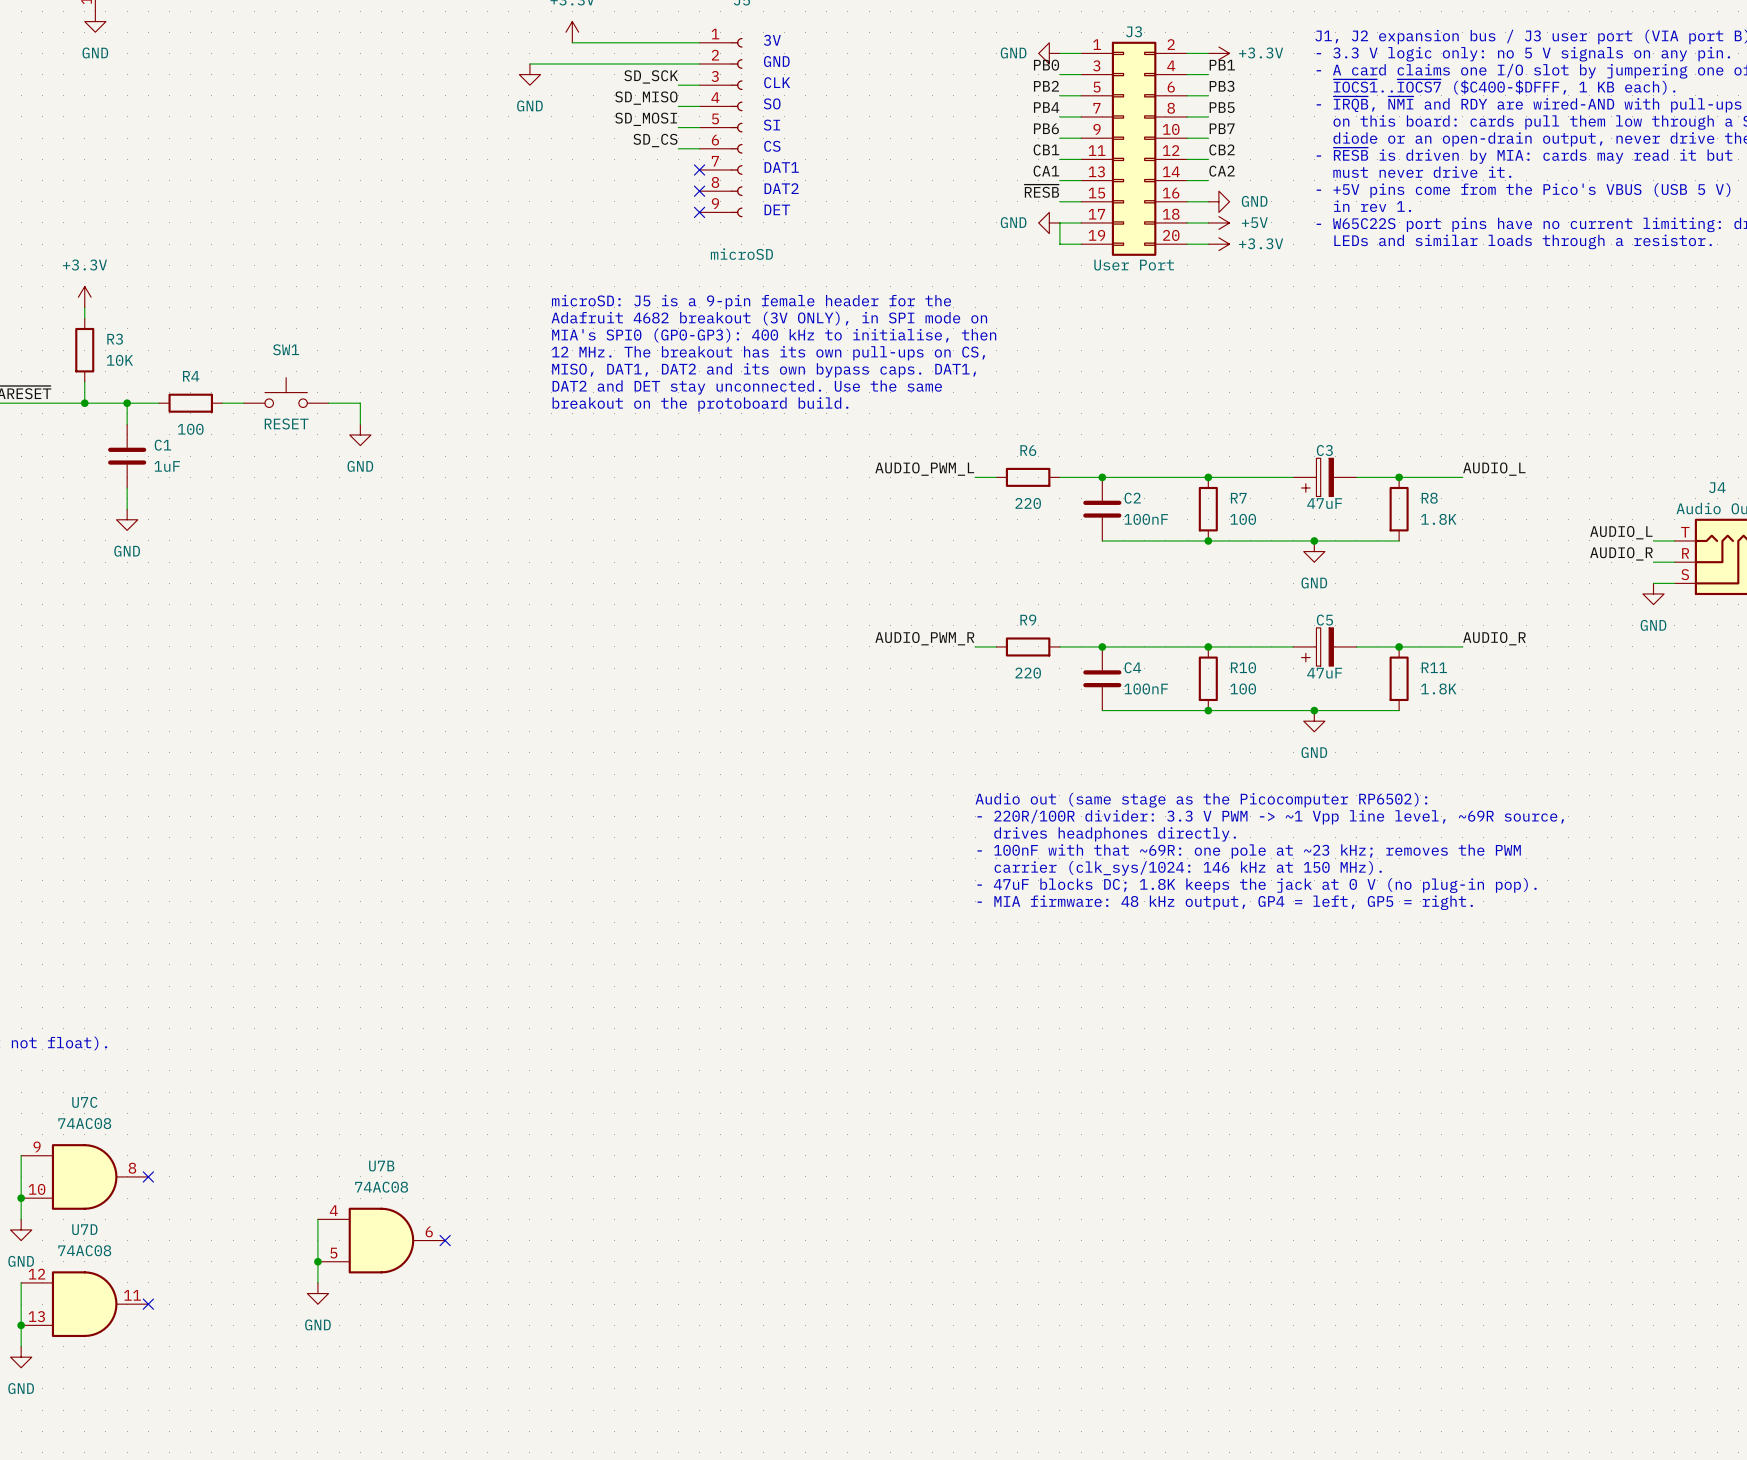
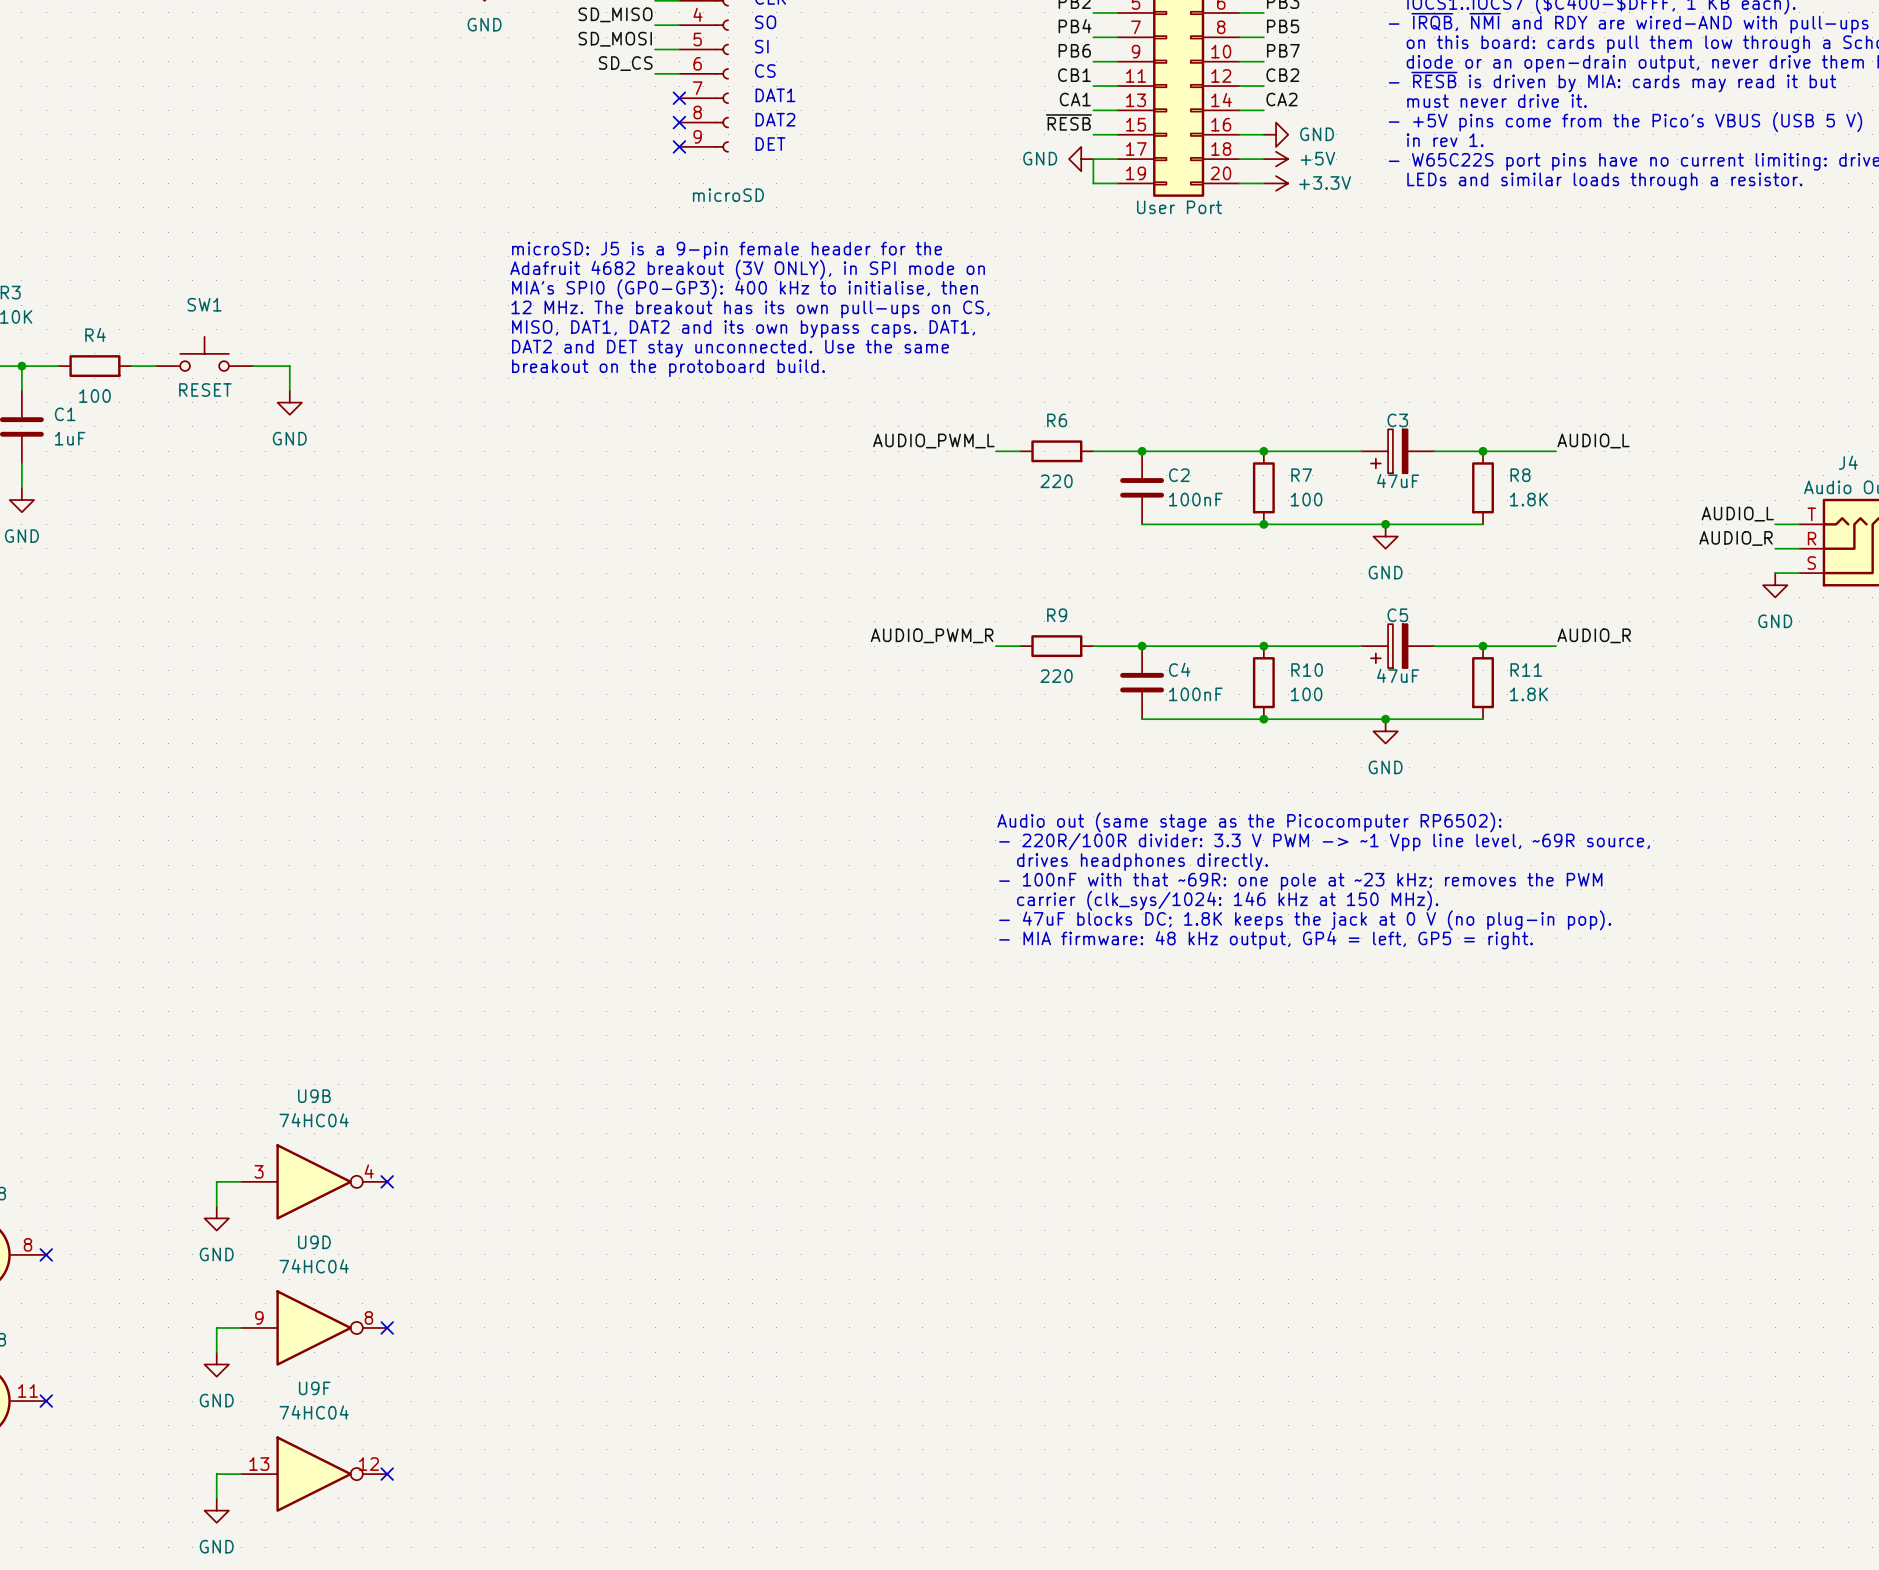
wire: none -> (241, 1181) (216, 1181) (216, 1206)
U9B: none -> 74HC04 (314, 1181)
no-connect mark: none -> (387, 1181)
power symbol: none -> GND (216, 1218)
wire: (317, 1219) (317, 1282) -> none
wire: none -> (241, 1327) (216, 1327) (216, 1352)
U7B: 74AC08 (381, 1240) -> none
U9D: none -> 74HC04 (314, 1327)
junction: (317, 1261) -> none
power symbol position: GND (317, 1293) -> GND (216, 1364)
wire: none -> (241, 1474) (216, 1474) (216, 1498)
U9F: none -> 74HC04 (314, 1474)
no-connect mark: none -> (387, 1474)
power symbol: none -> GND (216, 1510)

